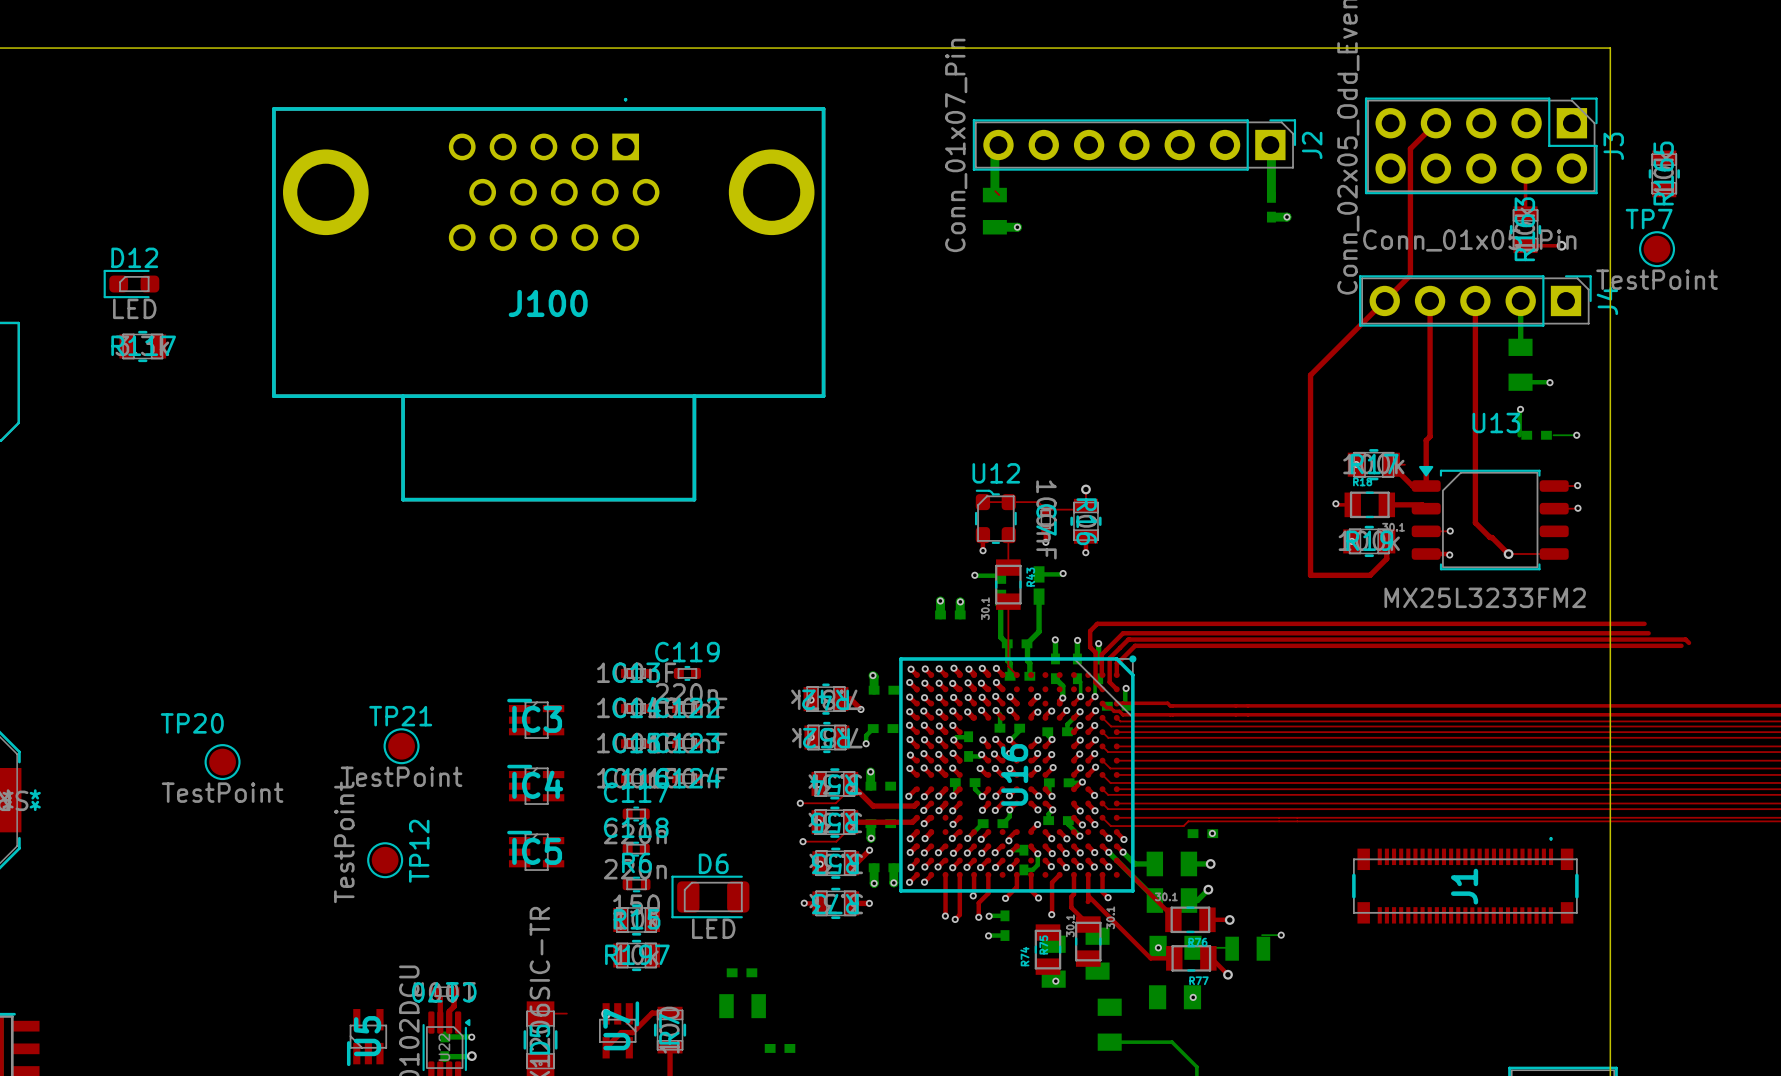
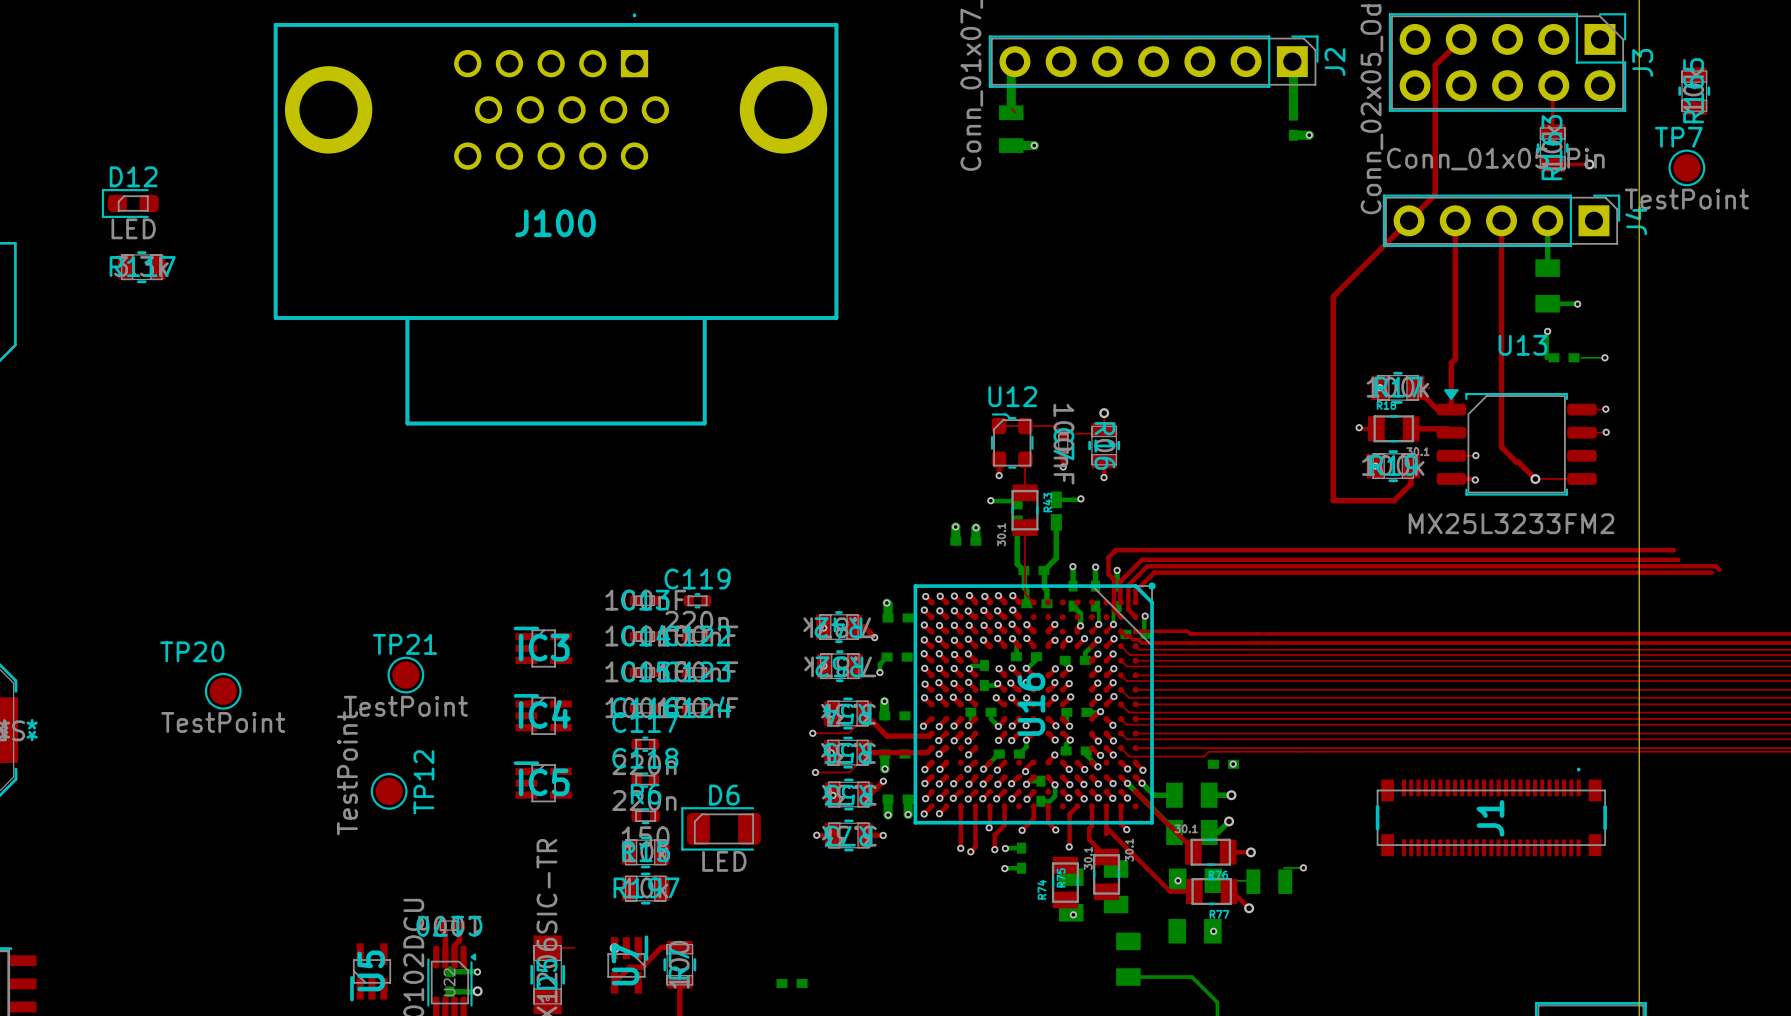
part: (742, 972) -> none
part: (742, 1006) -> none

